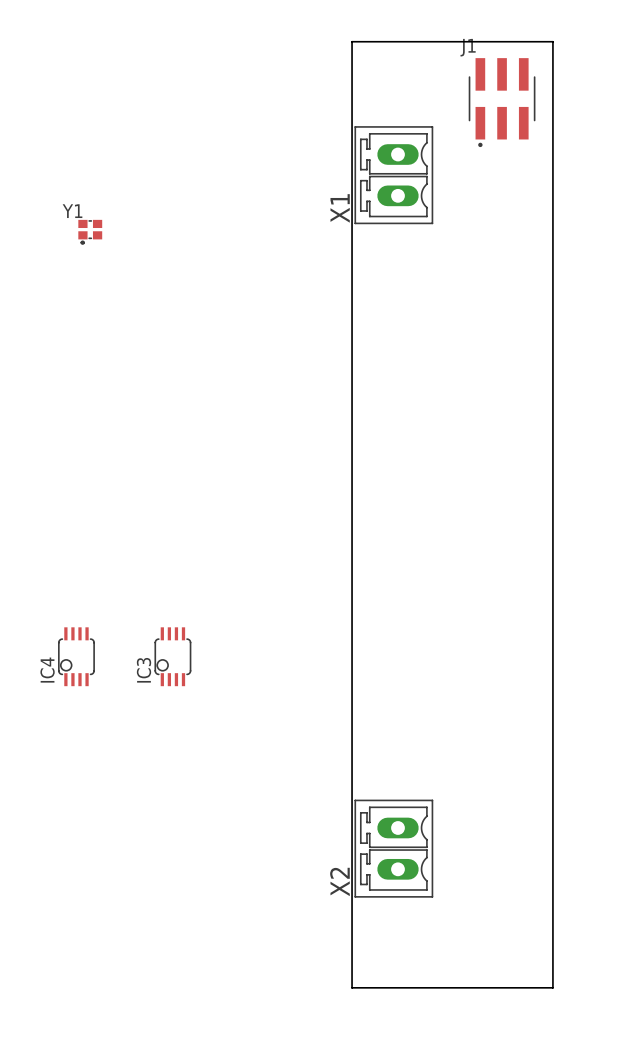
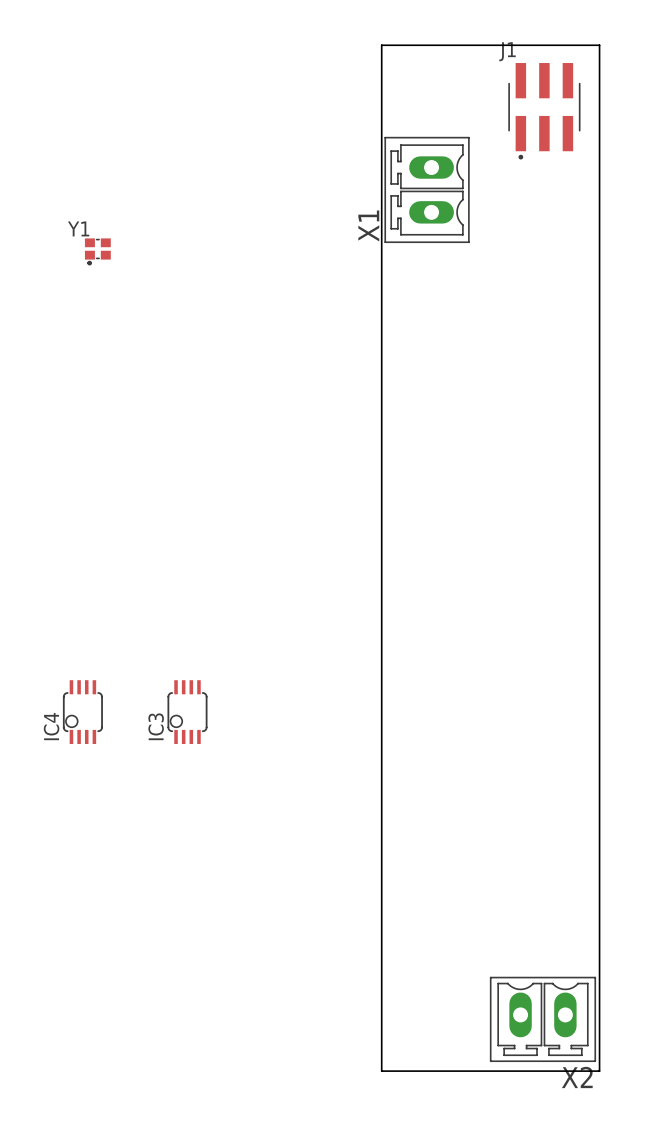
X2 rotation: 0° (393, 848) -> 90° counterclockwise (542, 1019)
X2 position: (393, 848) -> (542, 1019)

